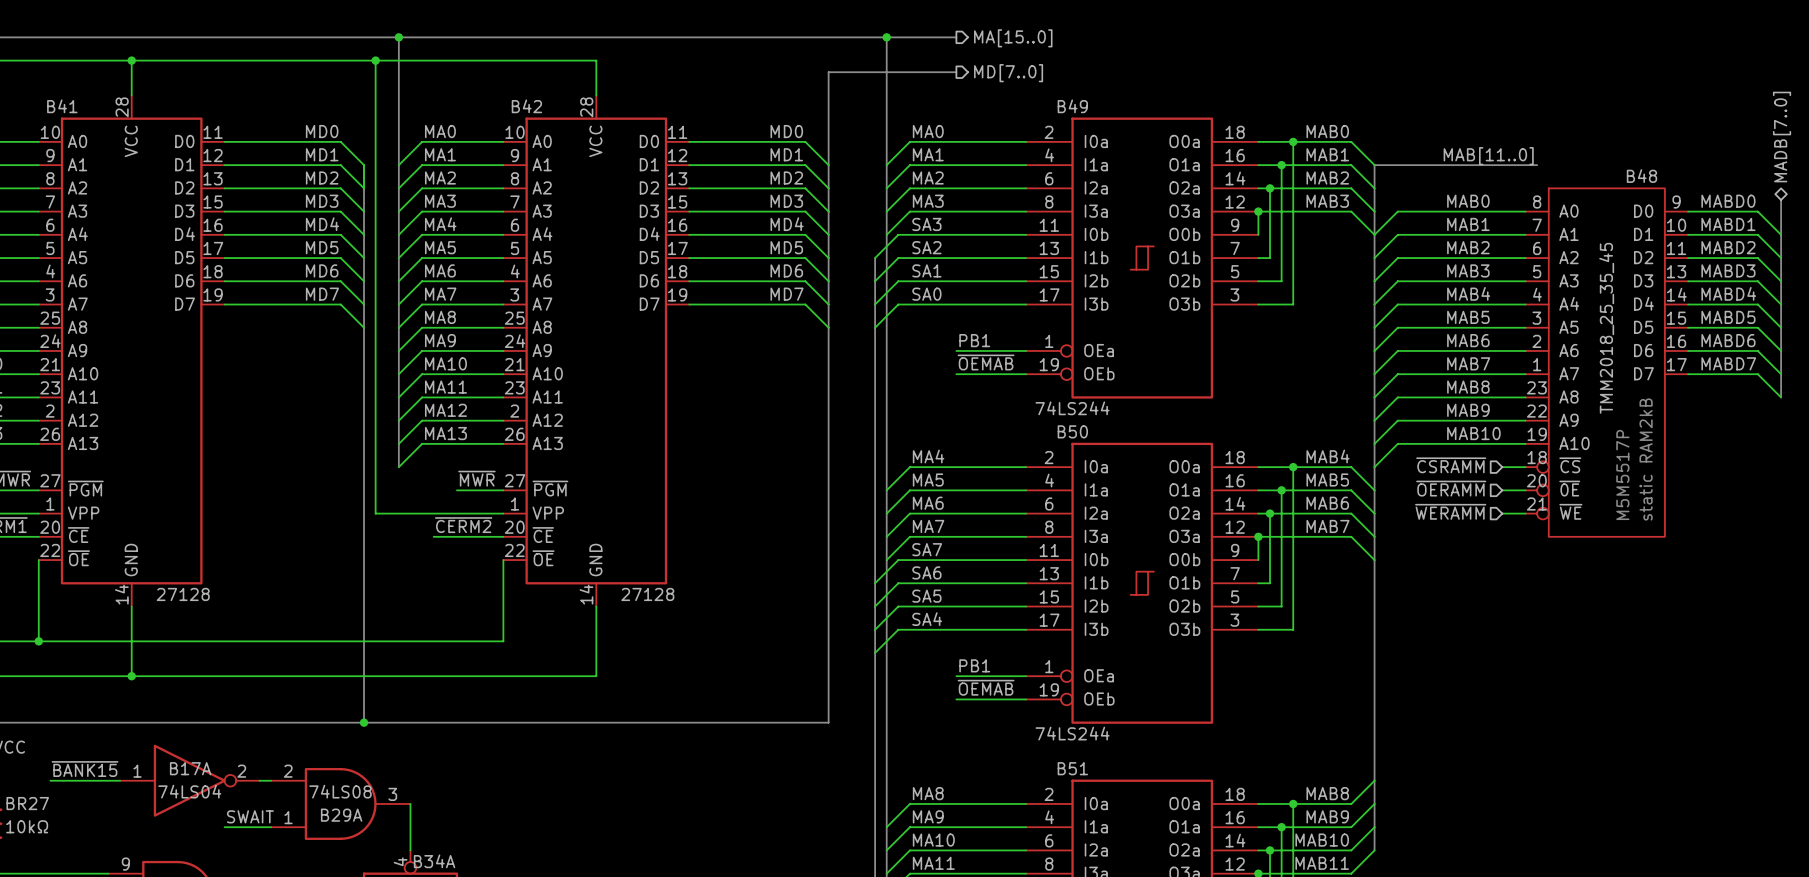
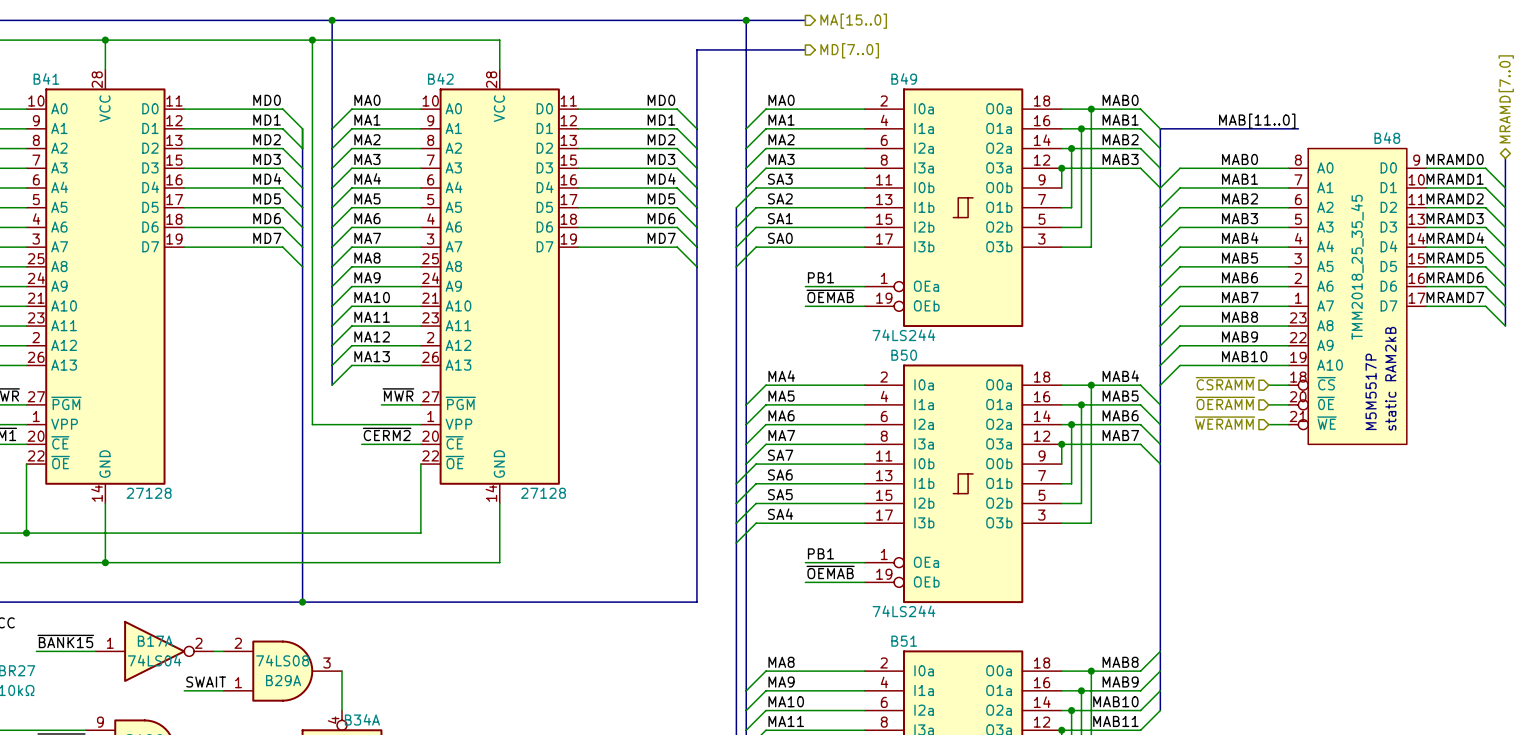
hierarchical label: MADB[7..0] (1782, 137) -> MRAMD[7..0] (1506, 99)
label: MABD0 (1728, 201) -> MRAMD0 (1455, 159)
label: MABD1 (1728, 224) -> MRAMD1 (1455, 179)
label: MABD2 (1728, 247) -> MRAMD2 (1455, 198)
label: MABD3 (1728, 270) -> MRAMD3 (1455, 218)
label: MABD4 (1728, 293) -> MRAMD4 (1455, 238)
label: MABD5 (1728, 317) -> MRAMD5 (1455, 258)
label: MABD6 (1728, 340) -> MRAMD6 (1455, 277)
label: MABD7 (1728, 363) -> MRAMD7 (1455, 297)

